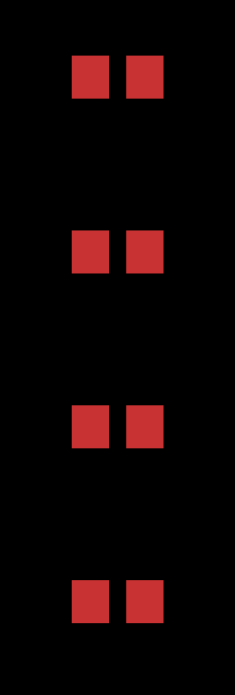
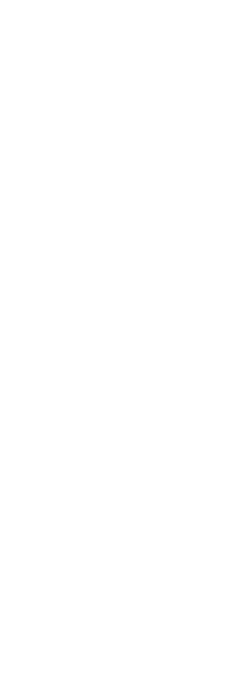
part: (117, 77) -> none
part: (117, 251) -> none
part: (117, 426) -> none
part: (117, 601) -> none

